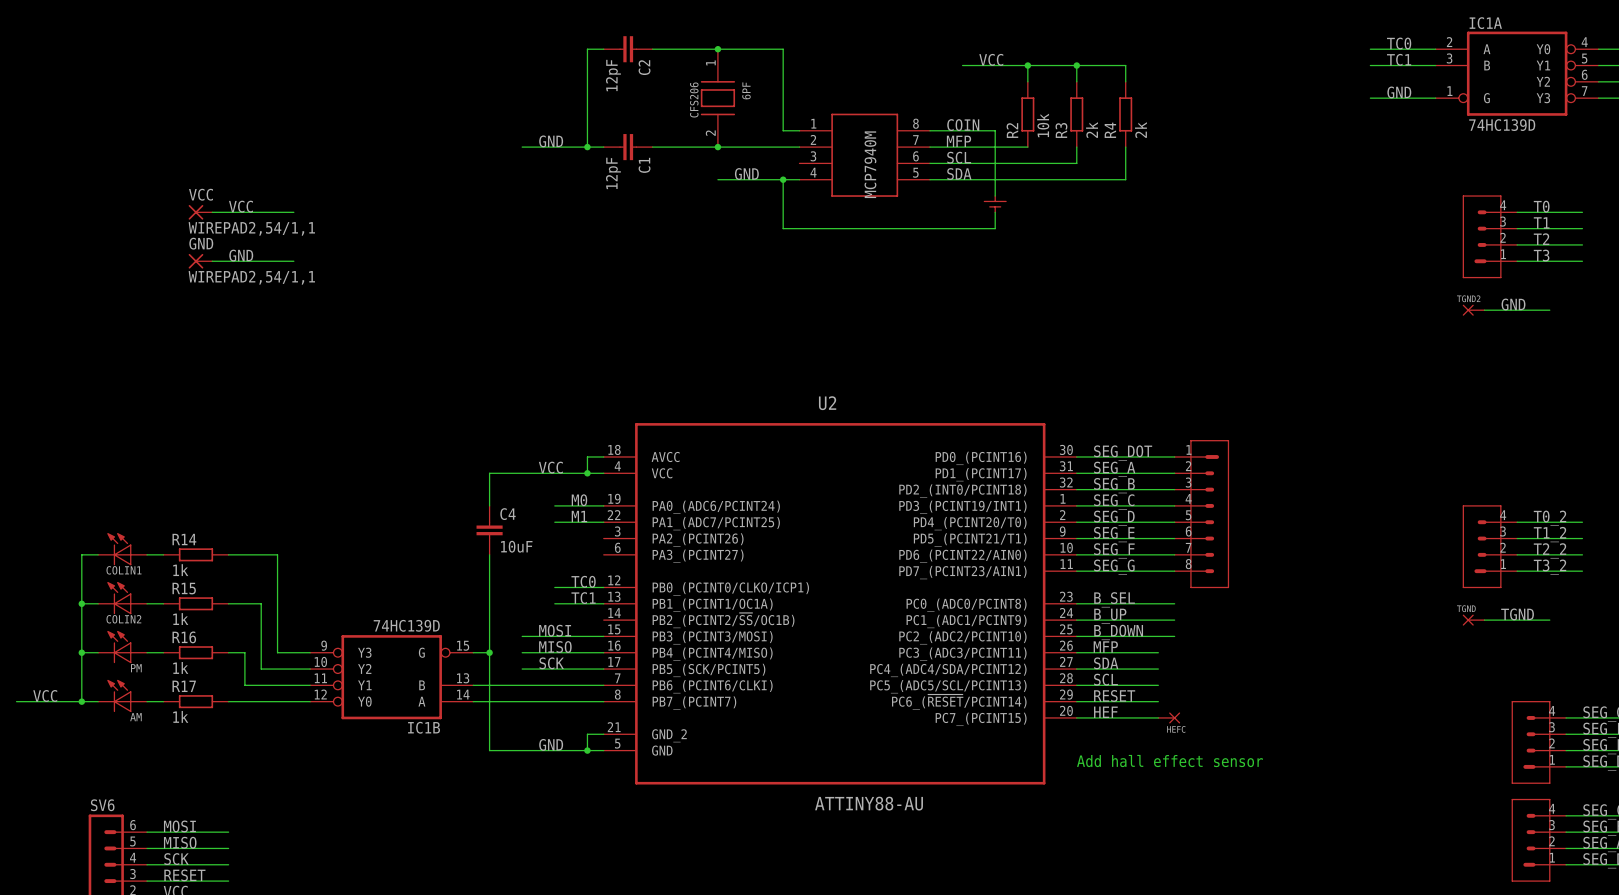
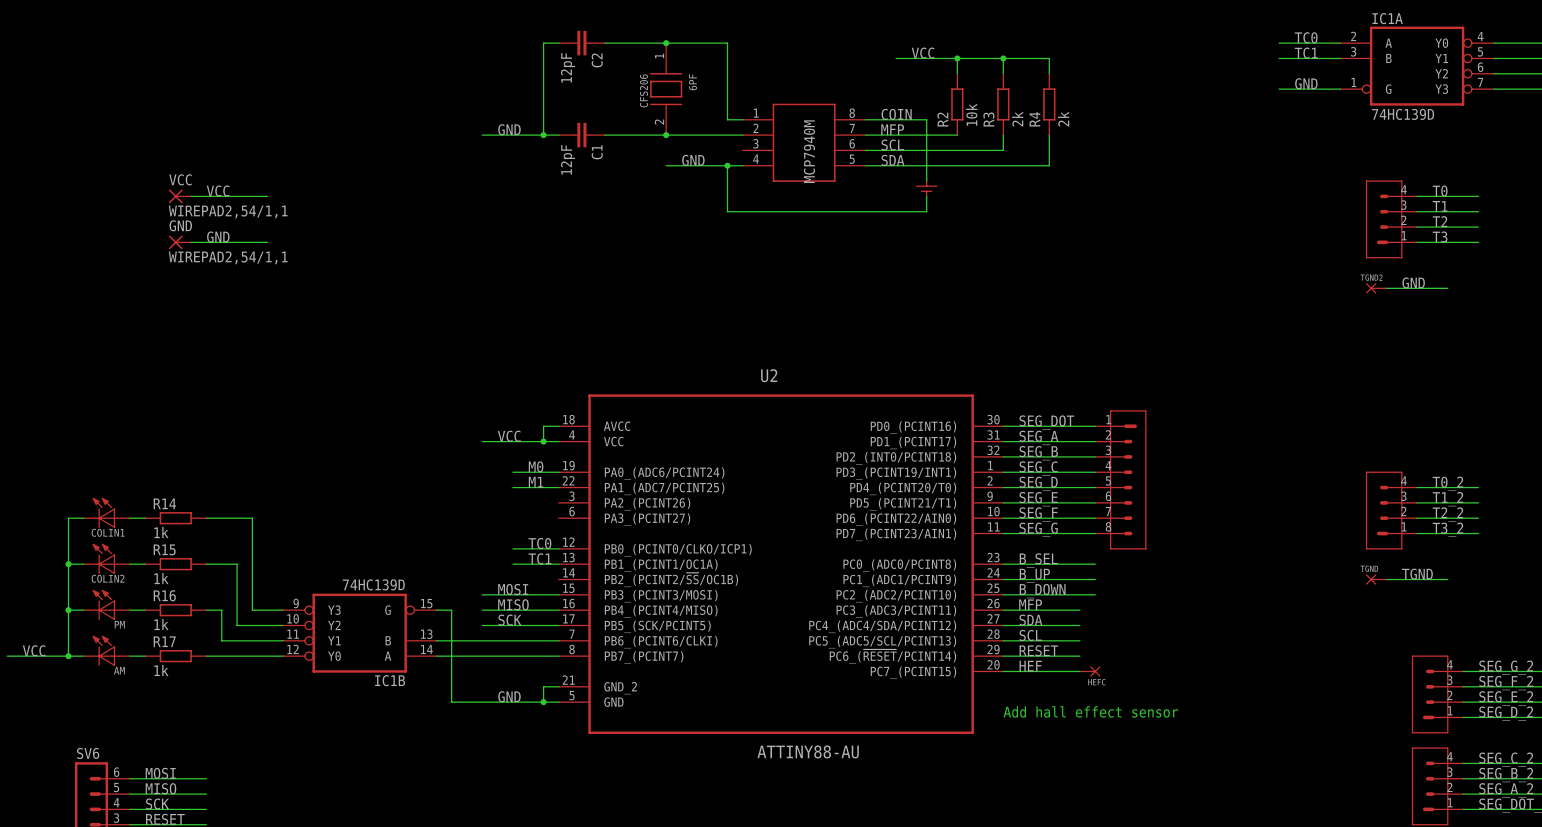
wire: (522, 473) (489, 473) (489, 505) -> none
C4: 10uF (489, 530) -> none
wire: (489, 554) (489, 652) -> none
junction: (489, 652) -> none

